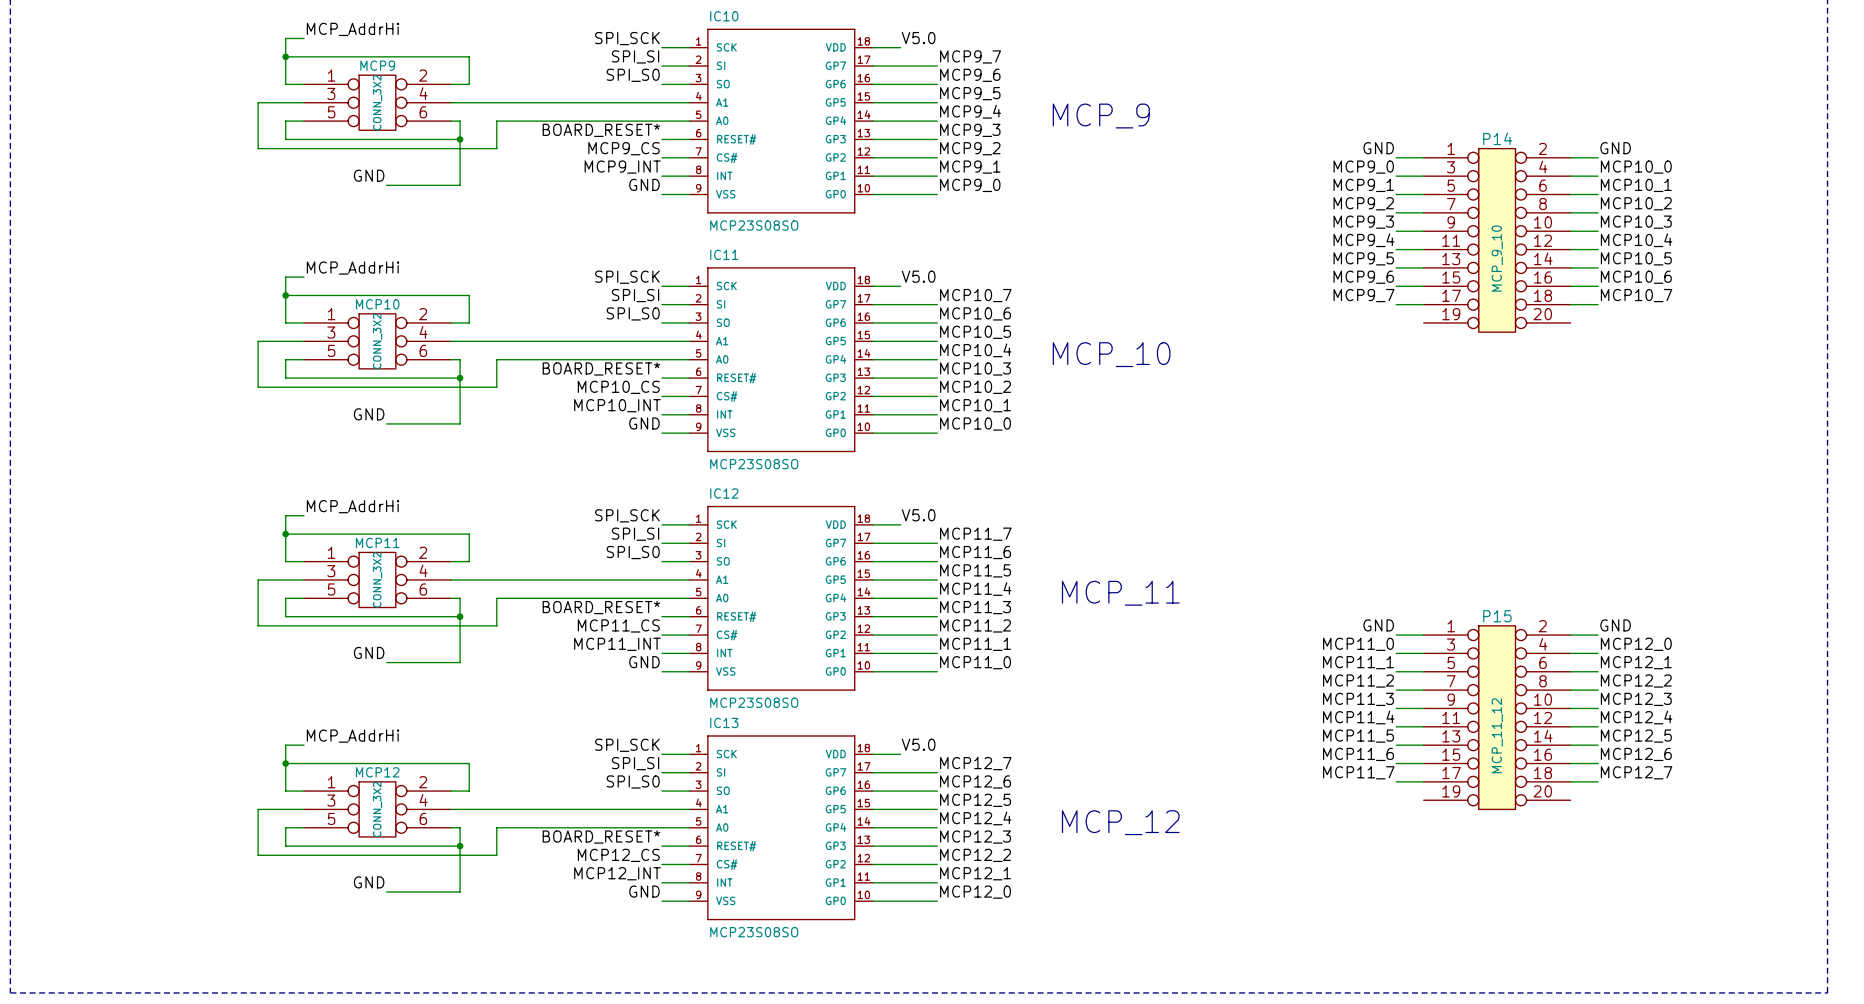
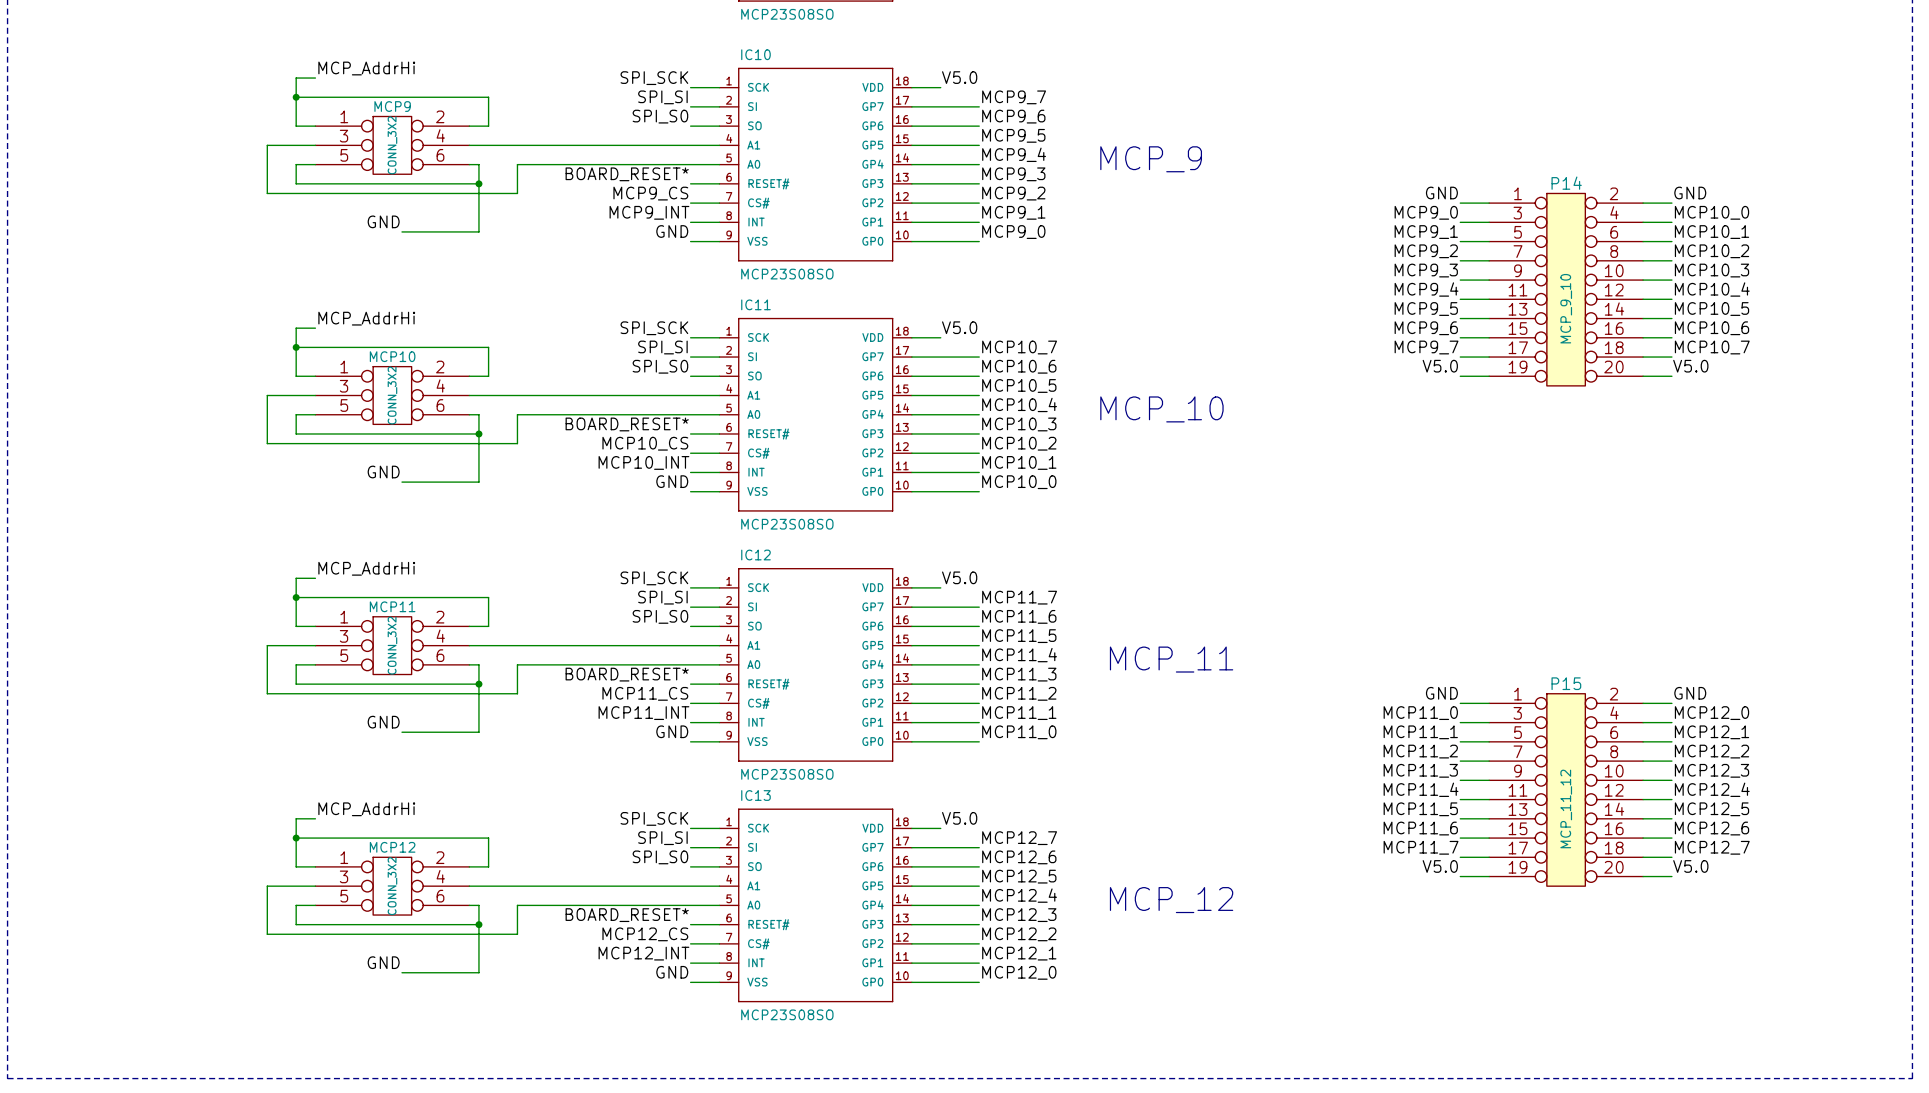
label: none -> V5.0 (1440, 366)
label: none -> V5.0 (1690, 366)
wire: none -> (1460, 376) (1489, 376)
wire: none -> (1643, 376) (1671, 376)
label: none -> V5.0 (1440, 866)
label: none -> V5.0 (1690, 866)
wire: none -> (1460, 876) (1489, 876)
wire: none -> (1643, 876) (1671, 876)

